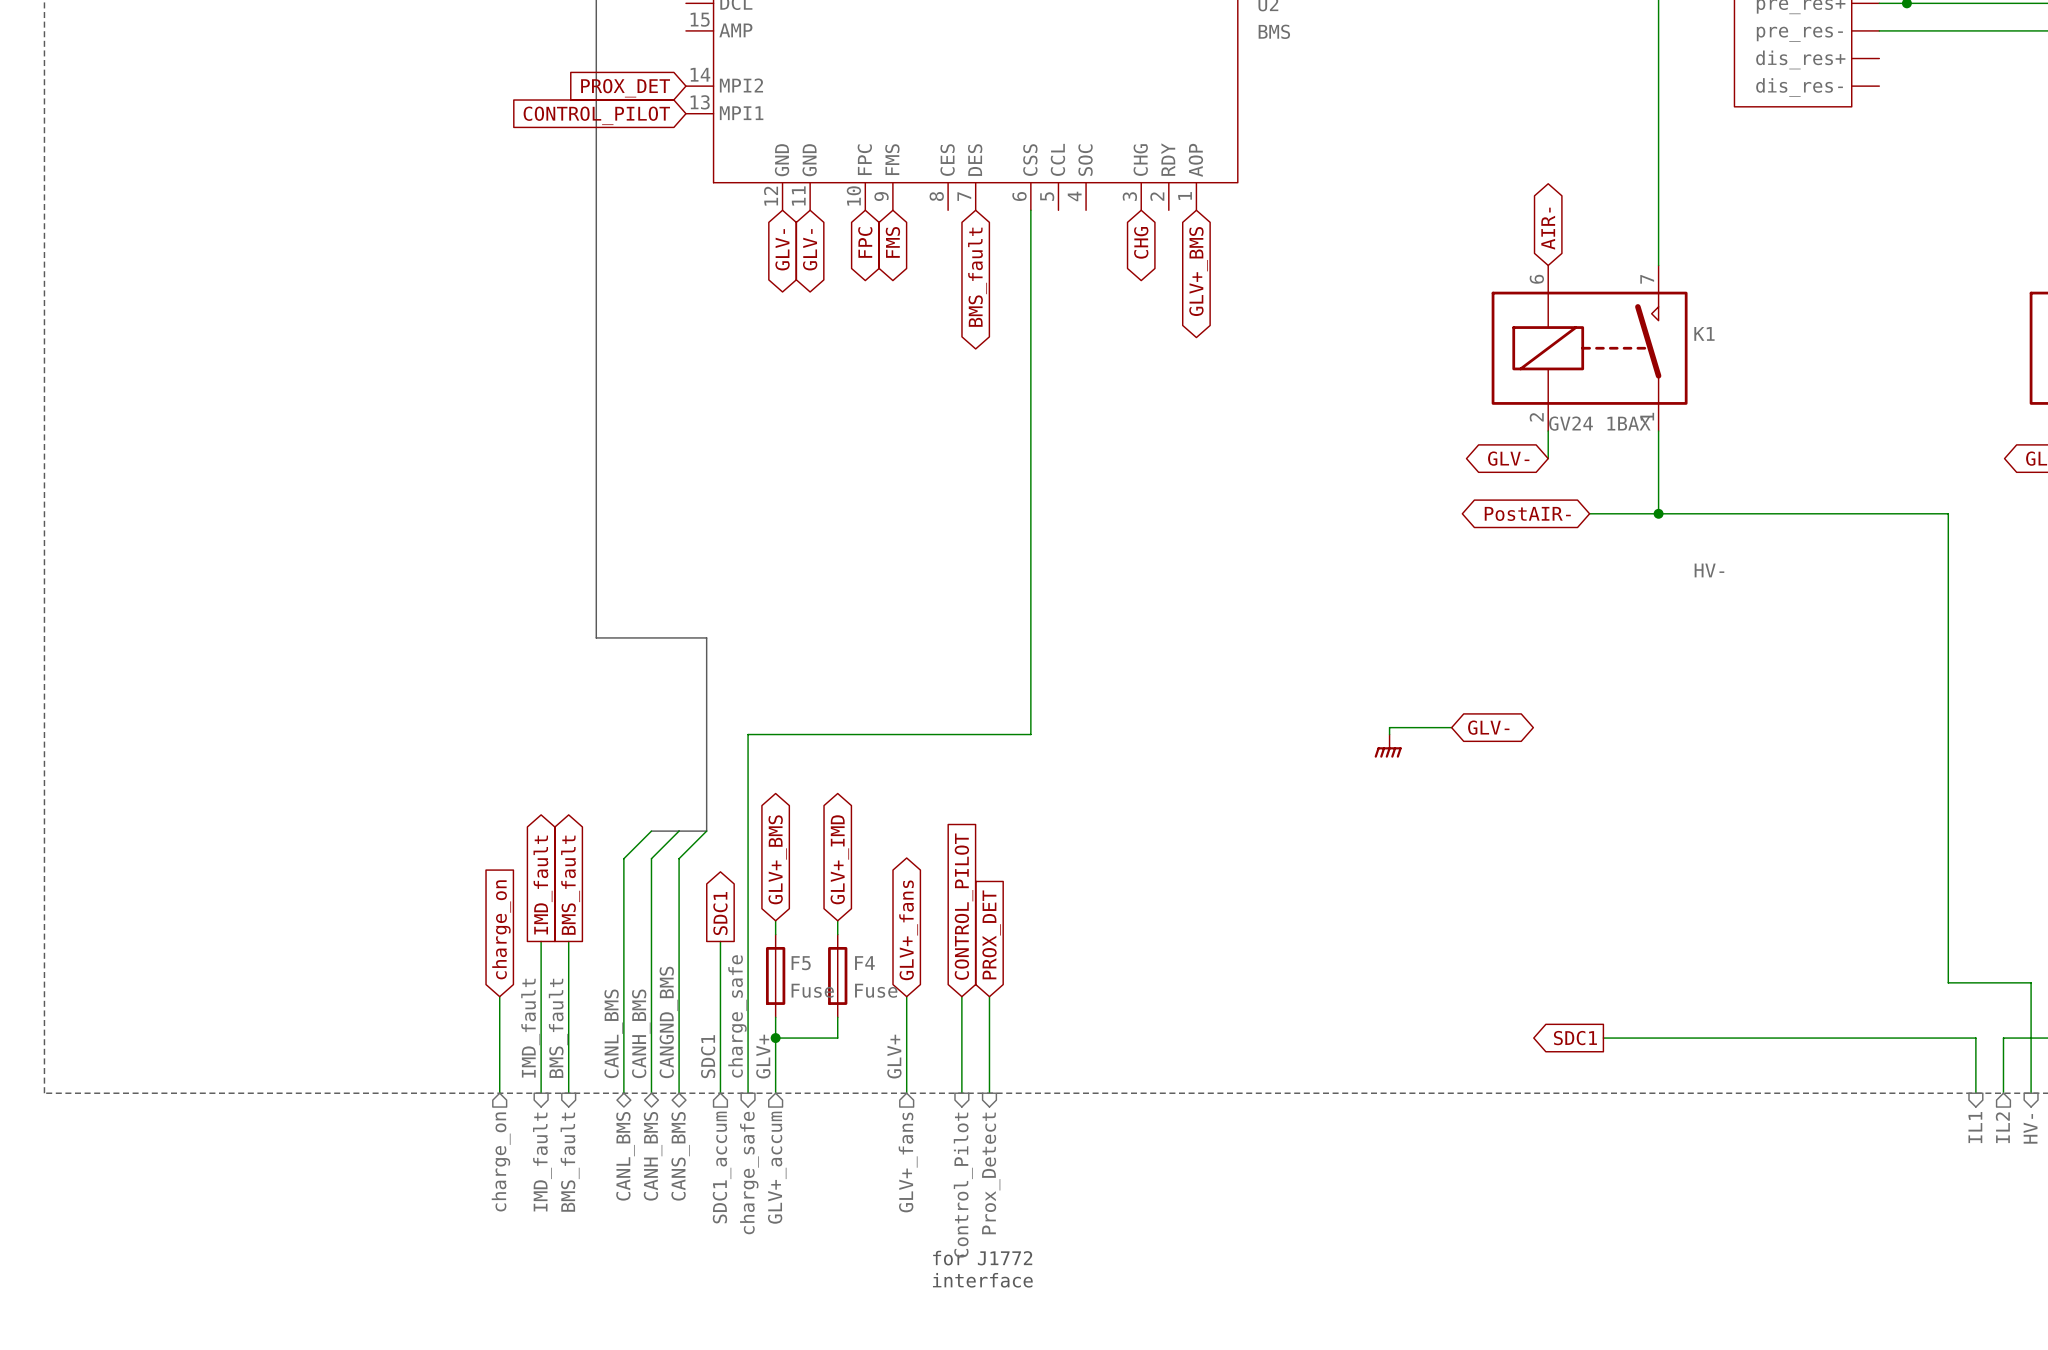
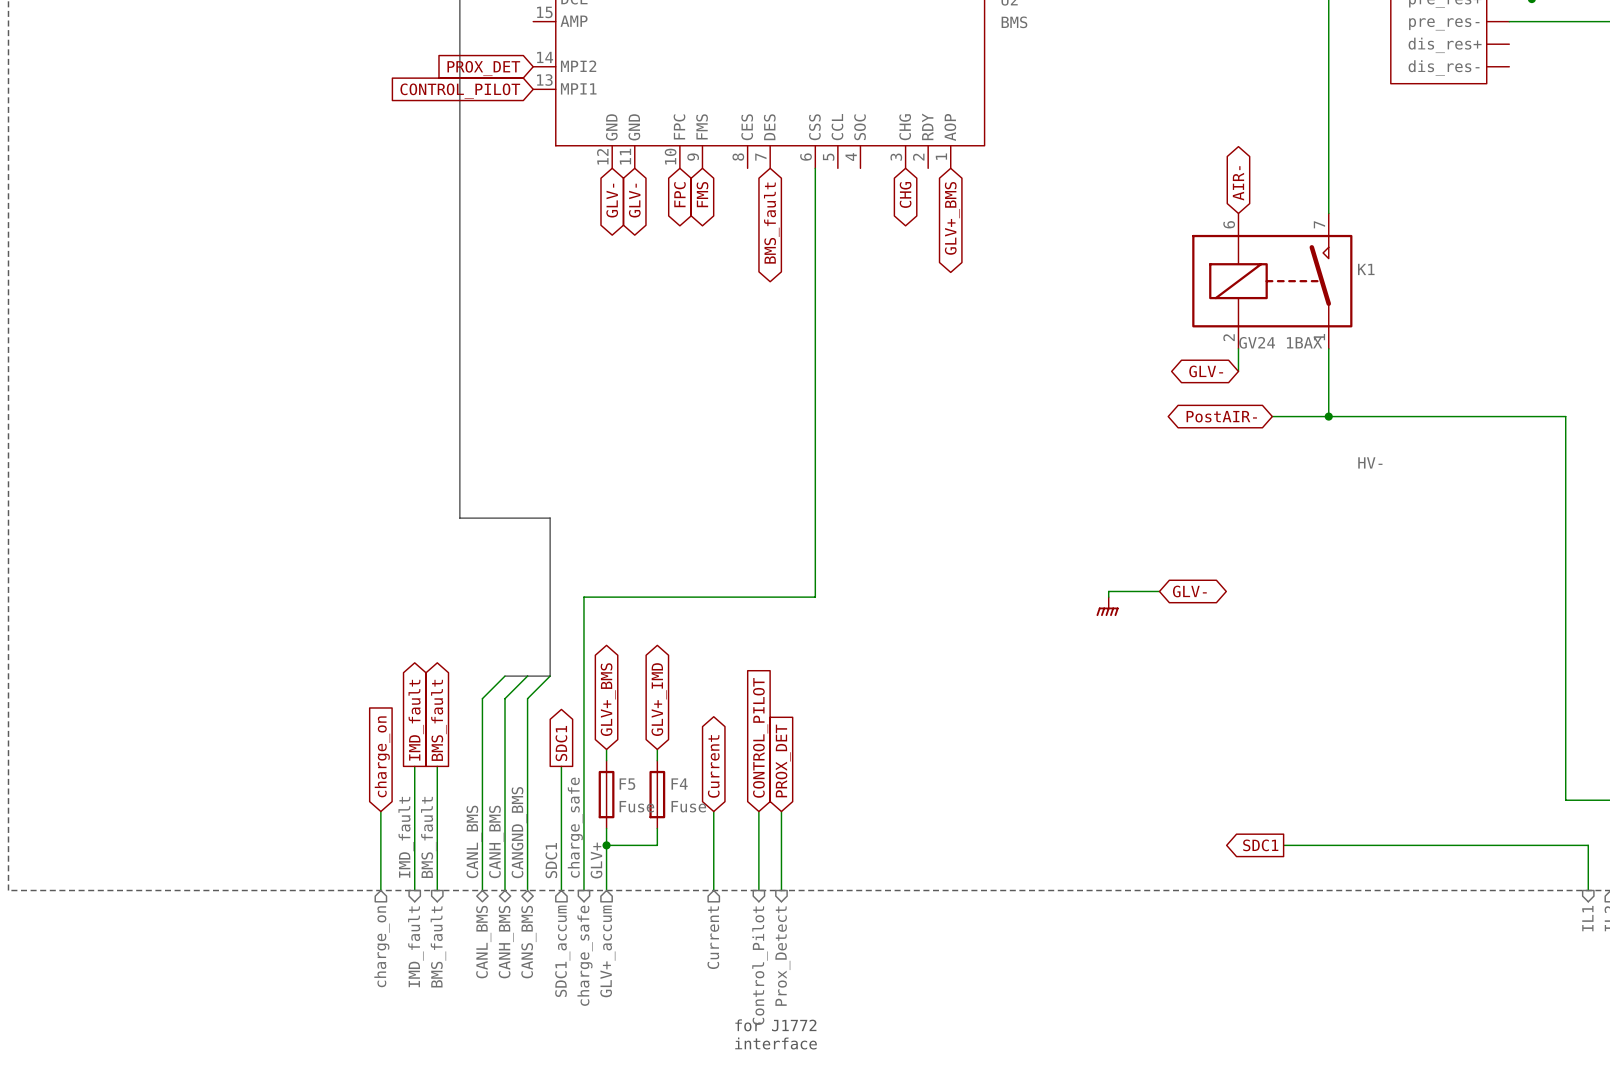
global label: GLV+_fans (908, 930) -> Current (713, 766)
label: GLV+ (894, 1056) -> none
hierarchical label: GLV+_fans (908, 1162) -> Current (713, 937)

